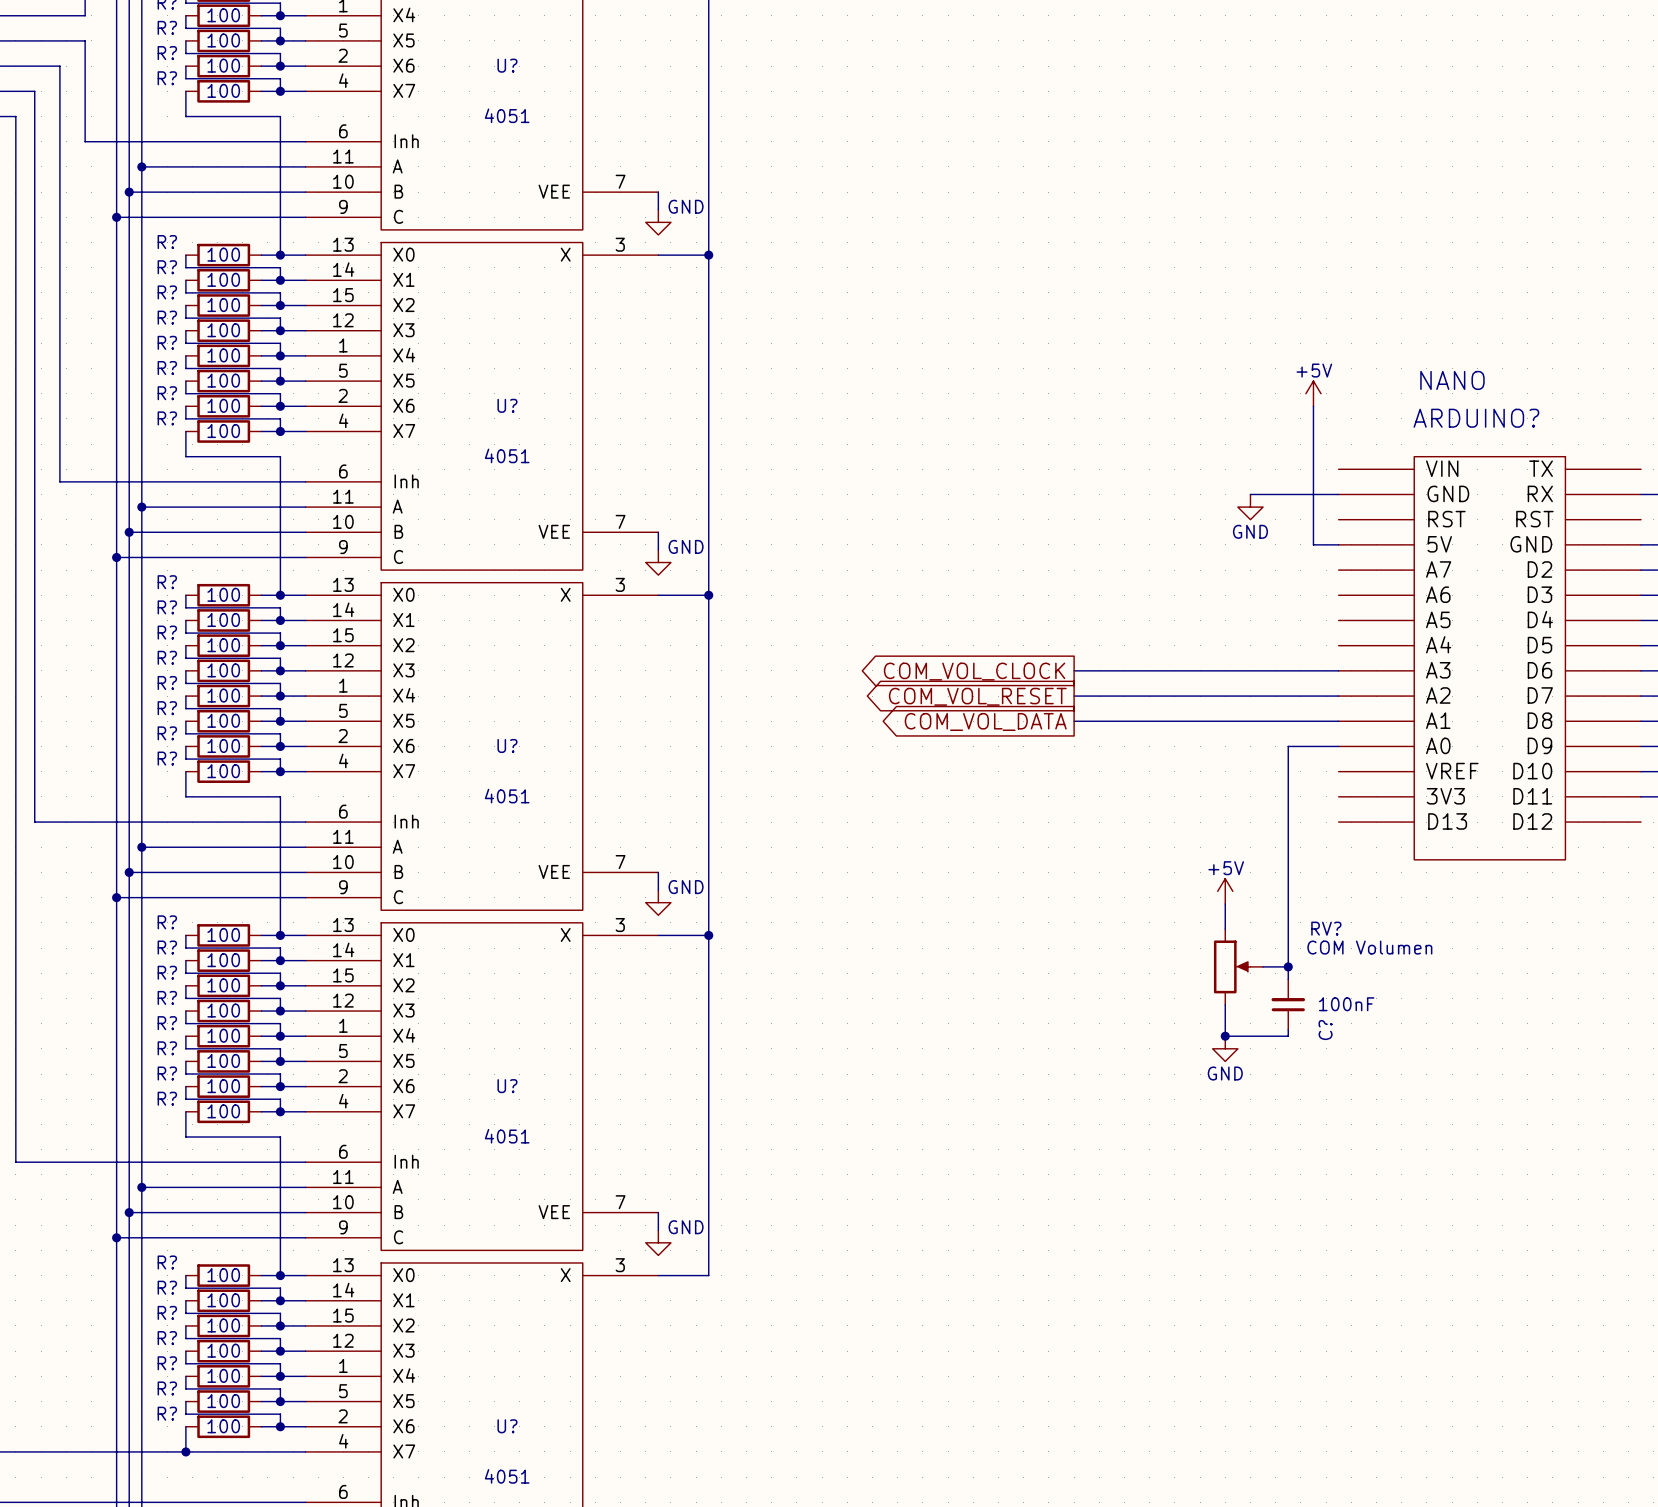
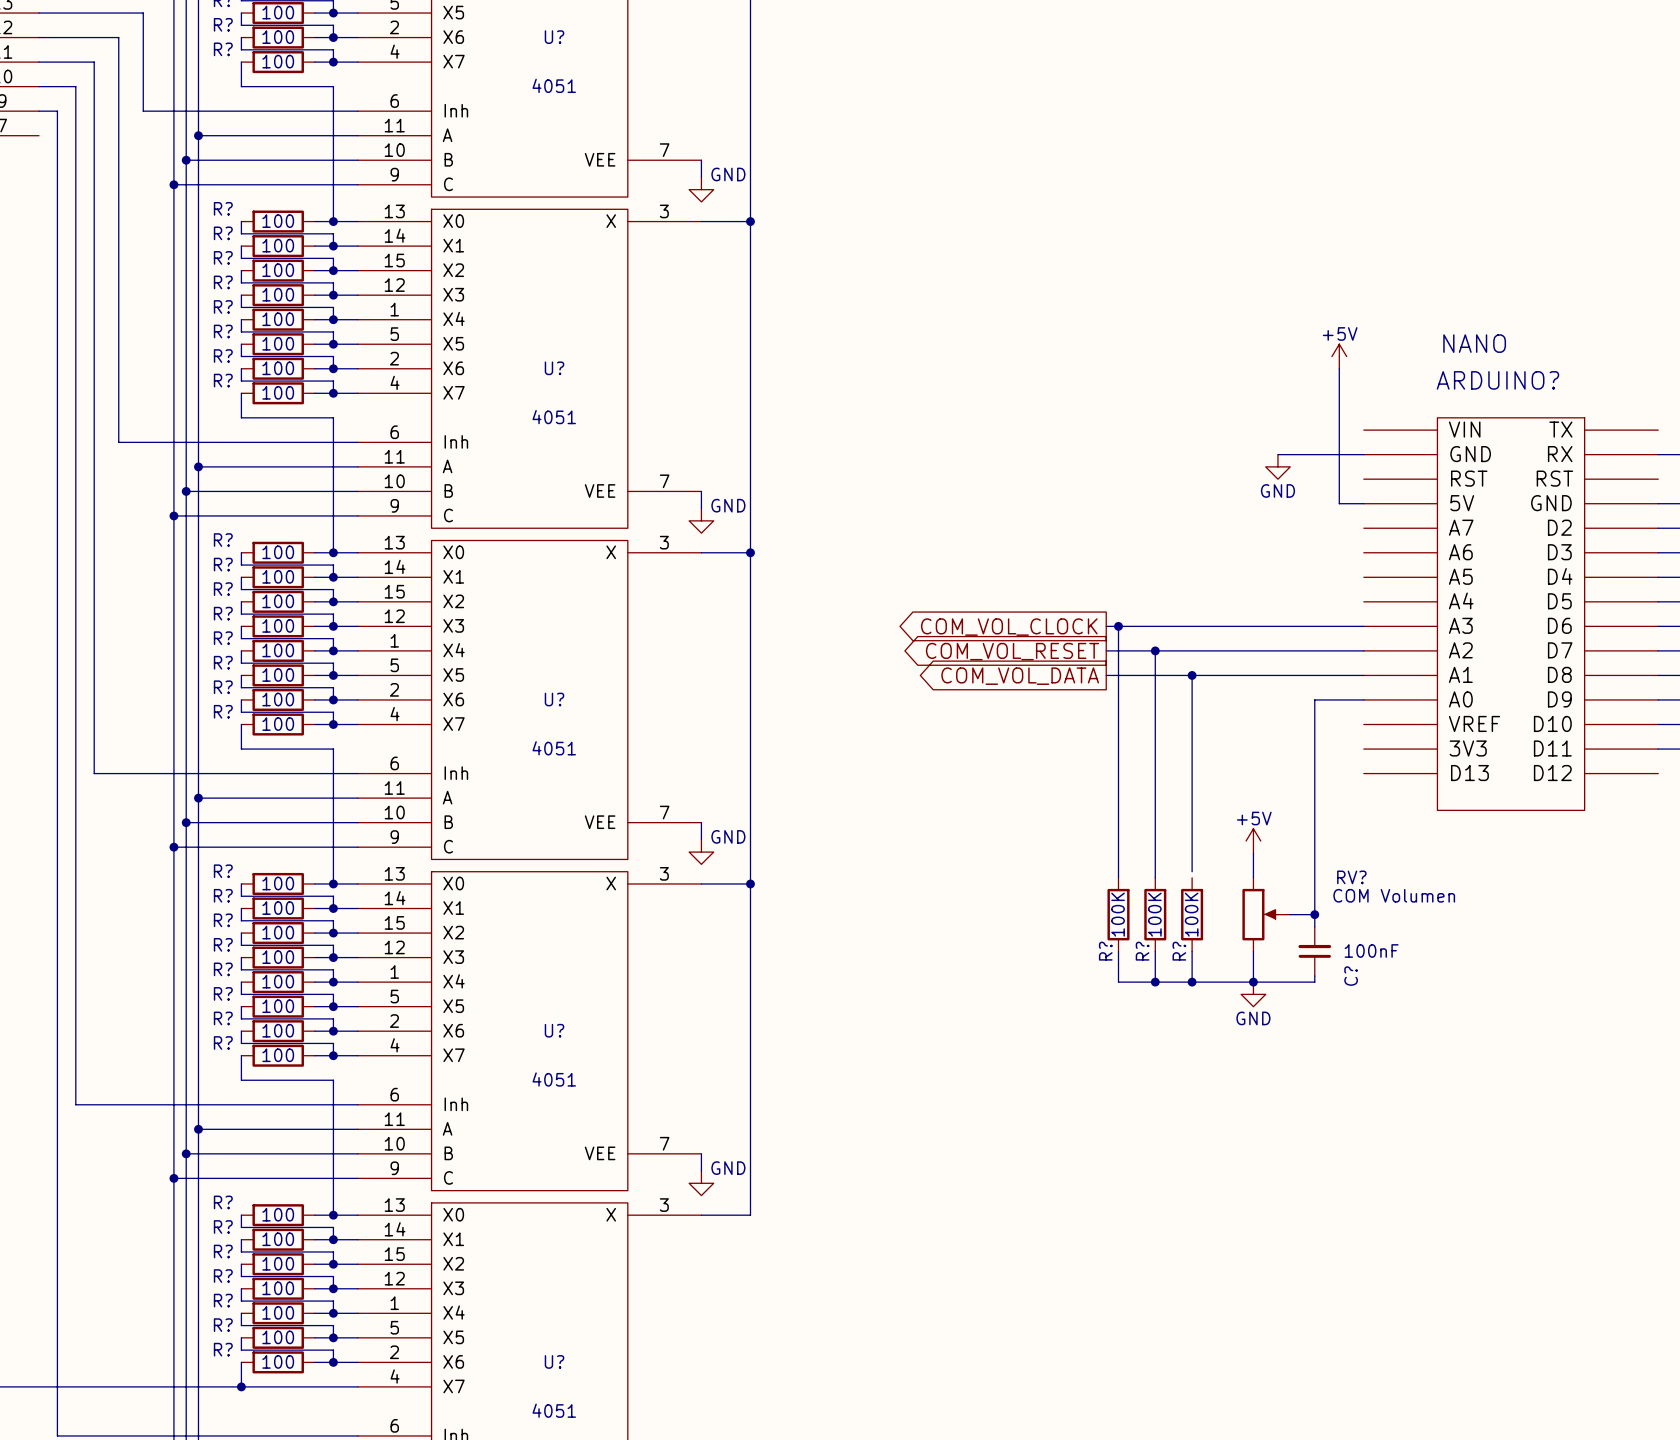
wire: none -> (1118, 626) (1118, 877)
junction: none -> (1118, 626)
wire: none -> (1155, 650) (1155, 877)
junction: none -> (1155, 650)
wire: none -> (1192, 675) (1192, 871)
junction: none -> (1192, 675)
R?: none -> 100K (1118, 914)
R?: none -> 100K (1155, 914)
R?: none -> 100K (1192, 914)
wire: none -> (1118, 951) (1118, 982) (1253, 982)
wire: none -> (1155, 951) (1155, 982)
wire: none -> (1192, 951) (1192, 982)
junction: none -> (1155, 982)
junction: none -> (1192, 982)

